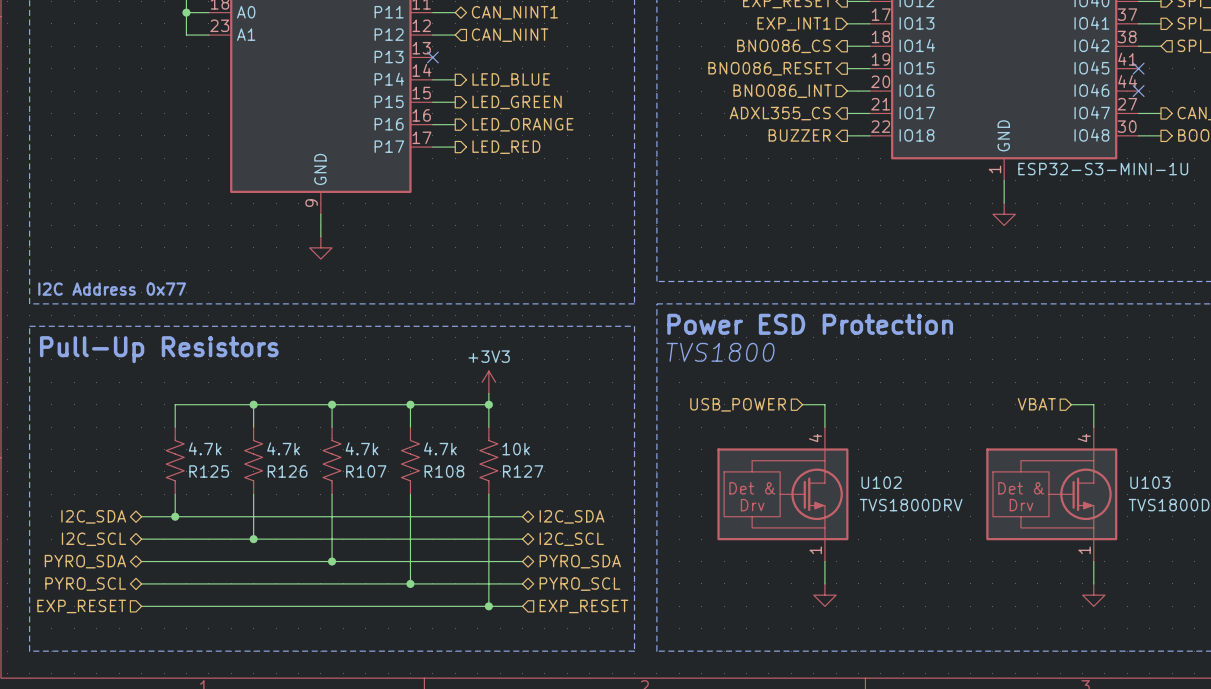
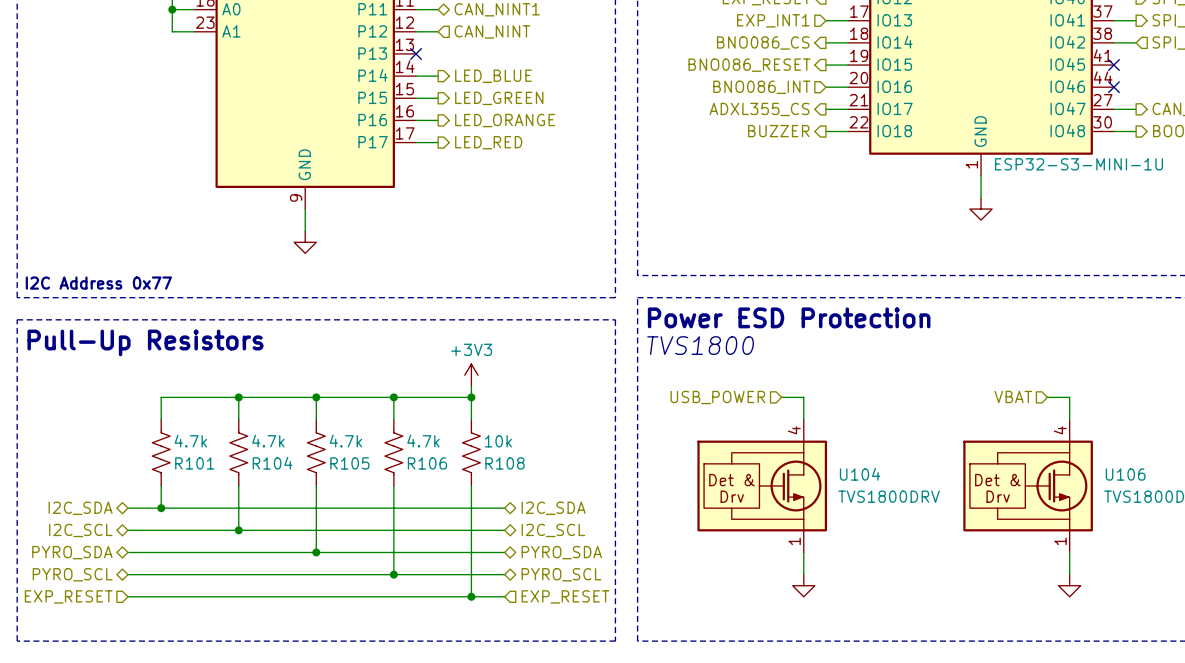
R125 name: R125 (209, 471) -> R101 (194, 463)
R126 name: R126 (287, 471) -> R104 (272, 463)
R107 name: R107 (366, 471) -> R105 (349, 463)
R108 name: R108 (444, 471) -> R106 (427, 463)
R127 name: R127 (523, 471) -> R108 (504, 463)
U102 name: U102 (881, 482) -> U104 (860, 474)
U103 name: U103 (1150, 482) -> U106 (1125, 474)

